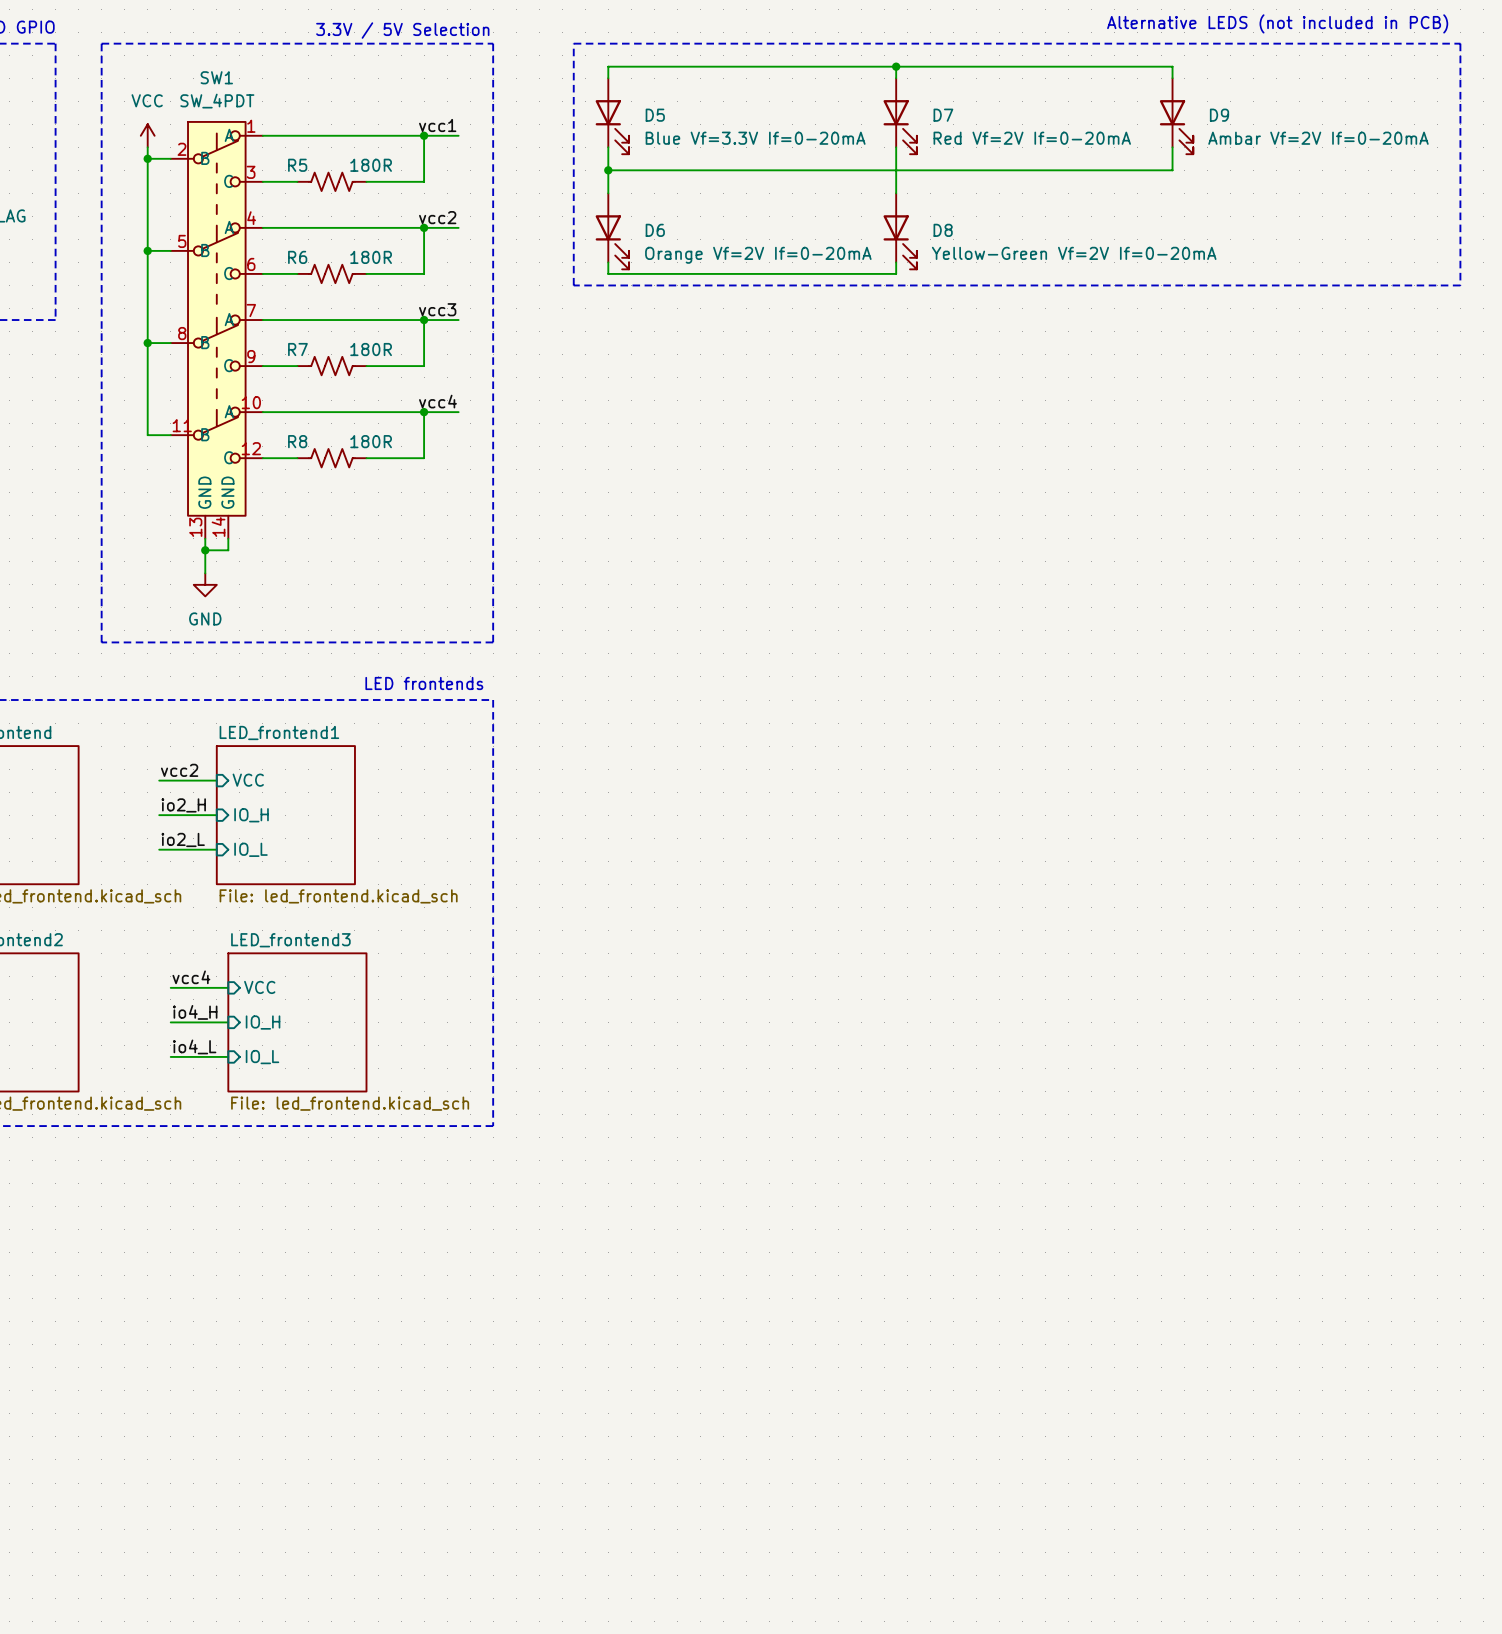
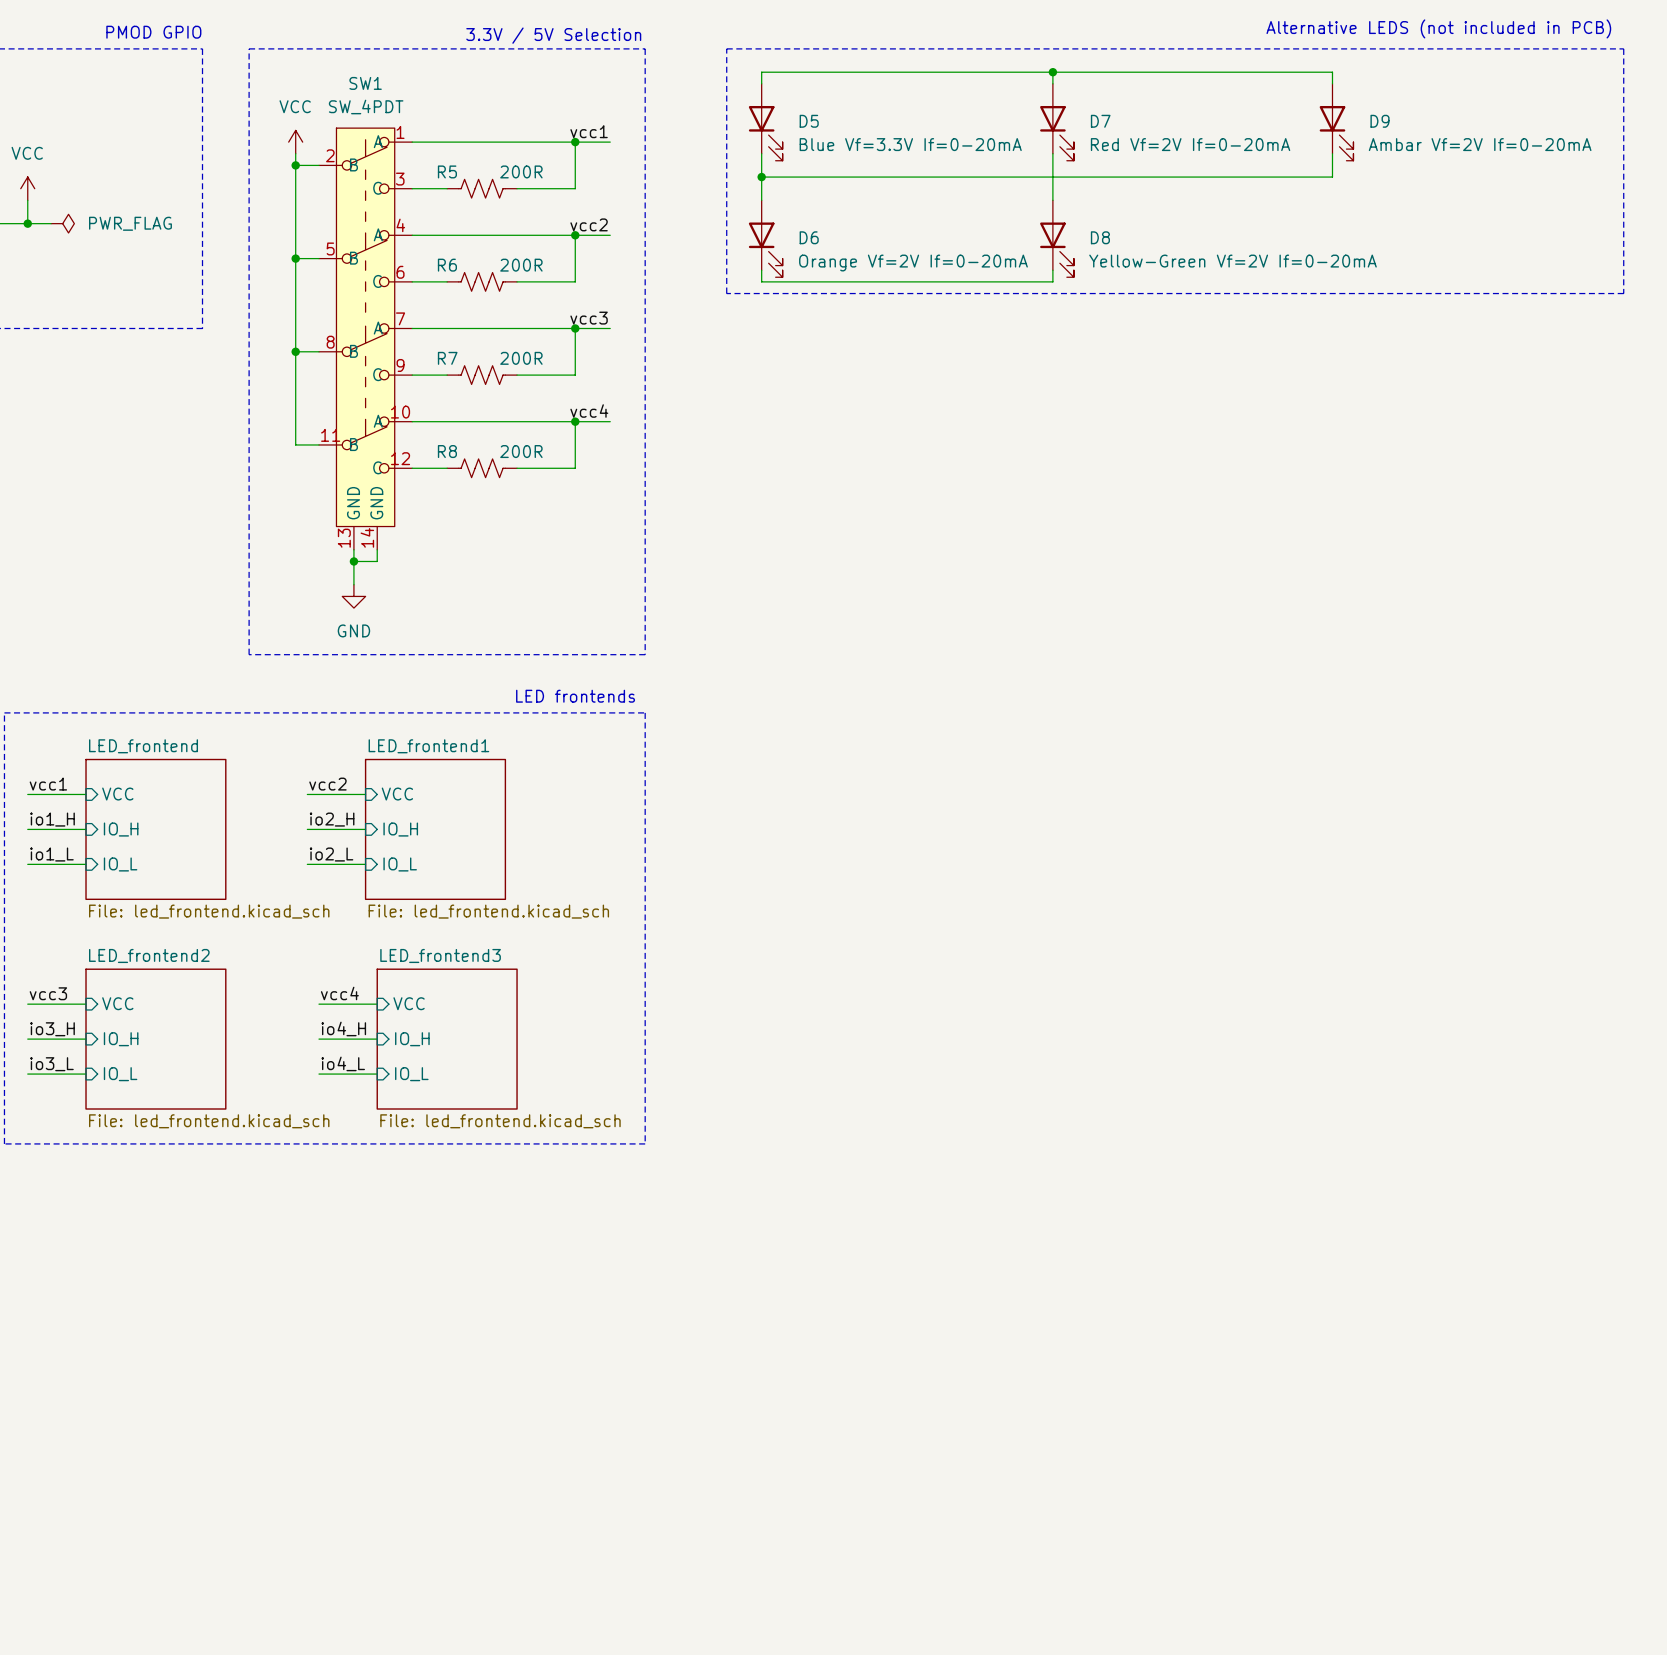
R5 value: 180R (371, 165) -> 200R (521, 171)
R6 value: 180R (371, 257) -> 200R (521, 265)
R7 value: 180R (371, 349) -> 200R (521, 358)
R8 value: 180R (371, 441) -> 200R (521, 451)

